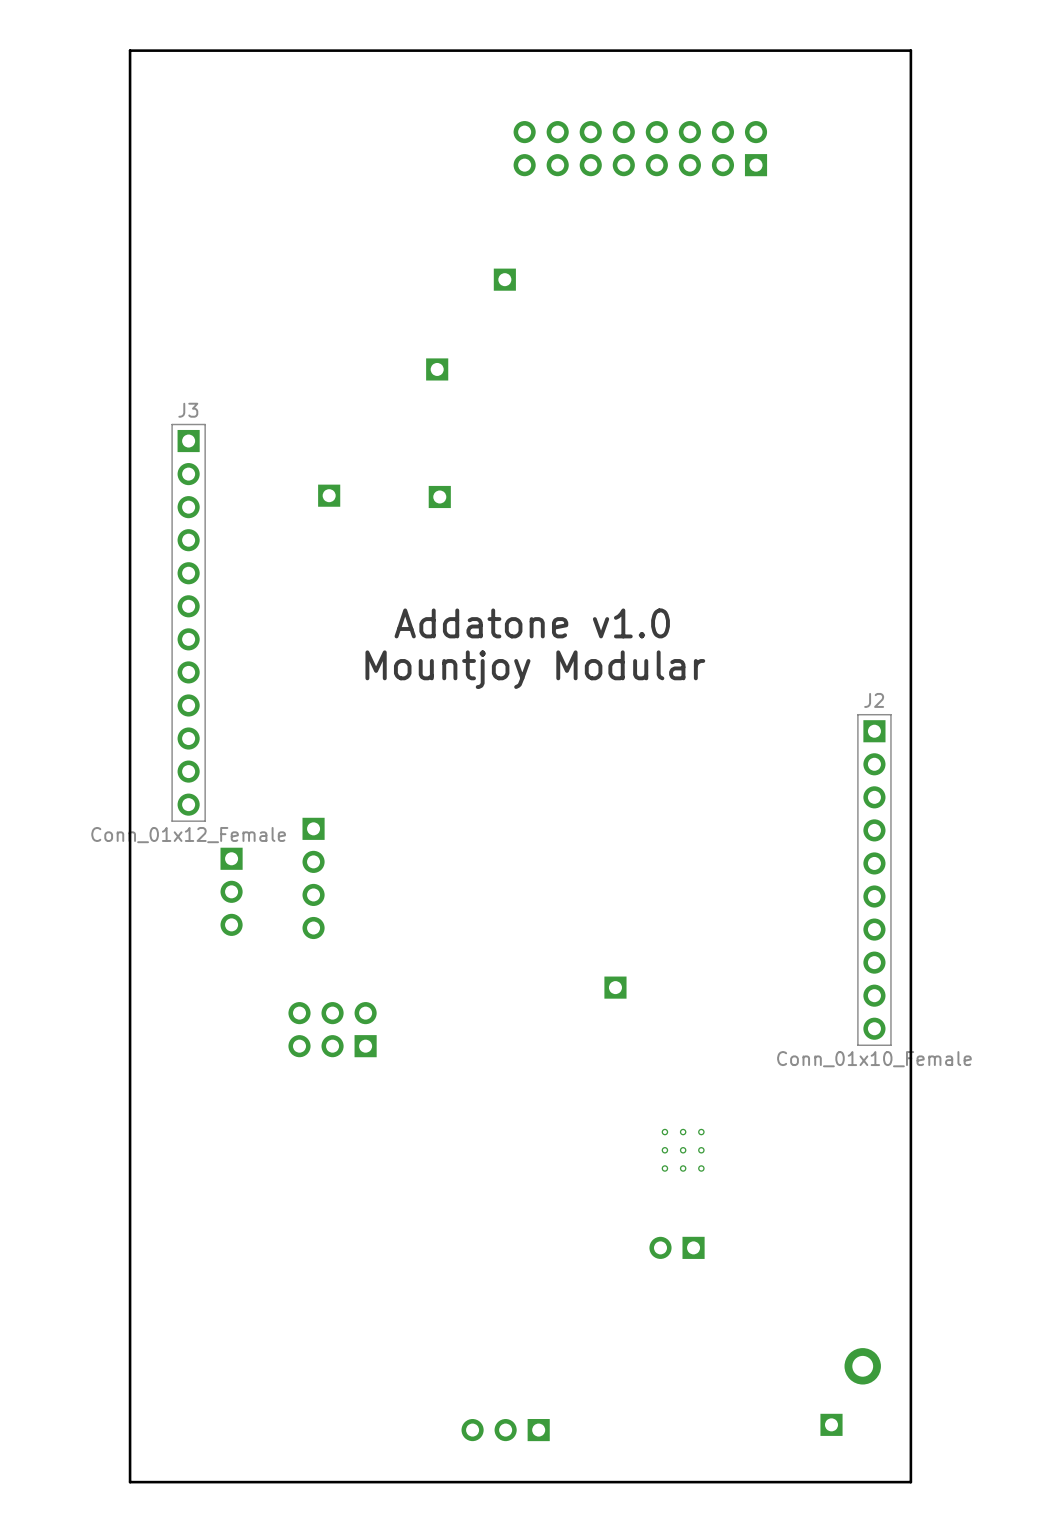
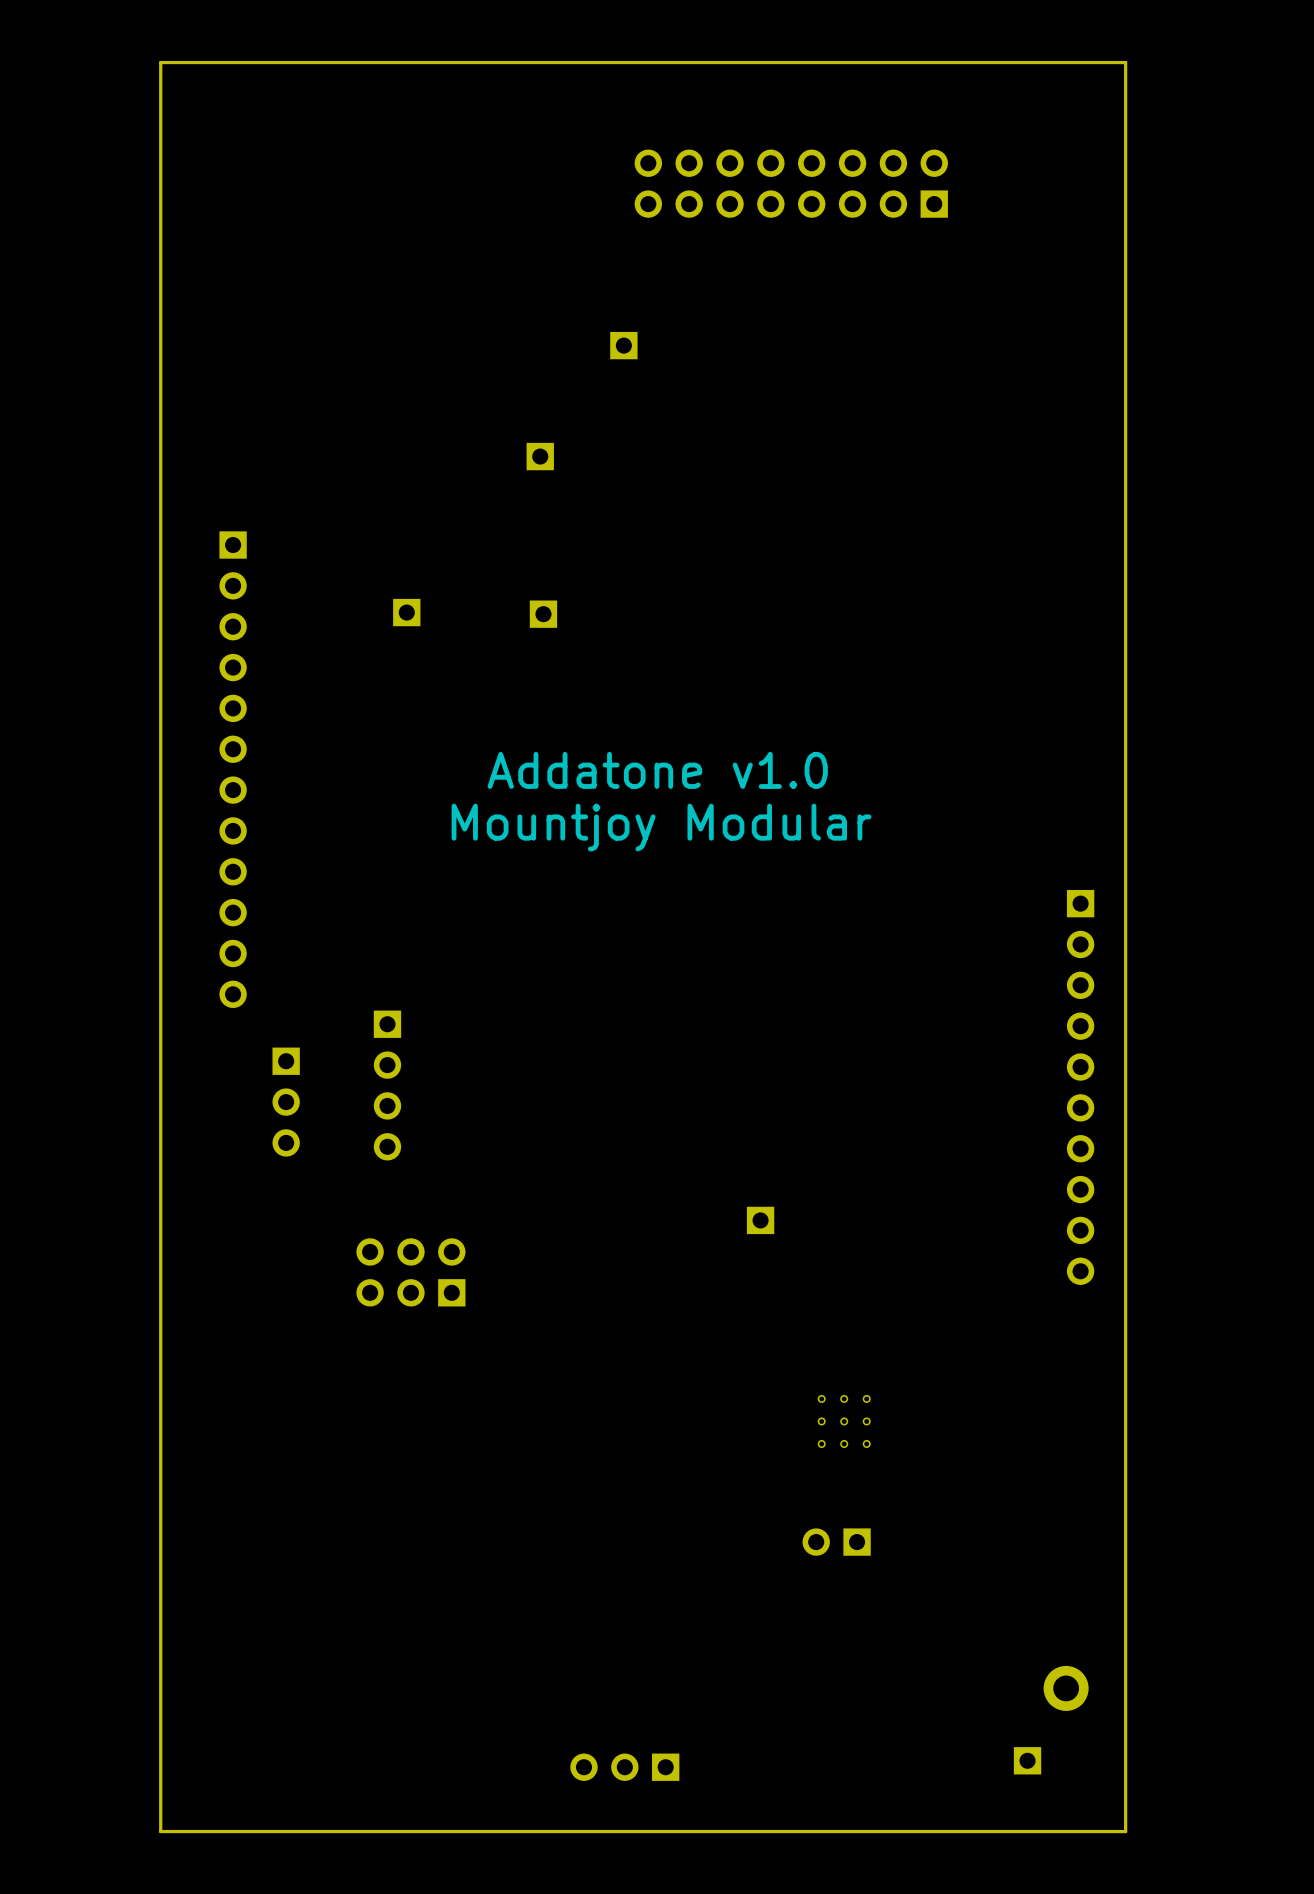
J3 side: bottom (188, 622) -> top (233, 769)
J2 side: bottom (874, 879) -> top (1080, 1087)

